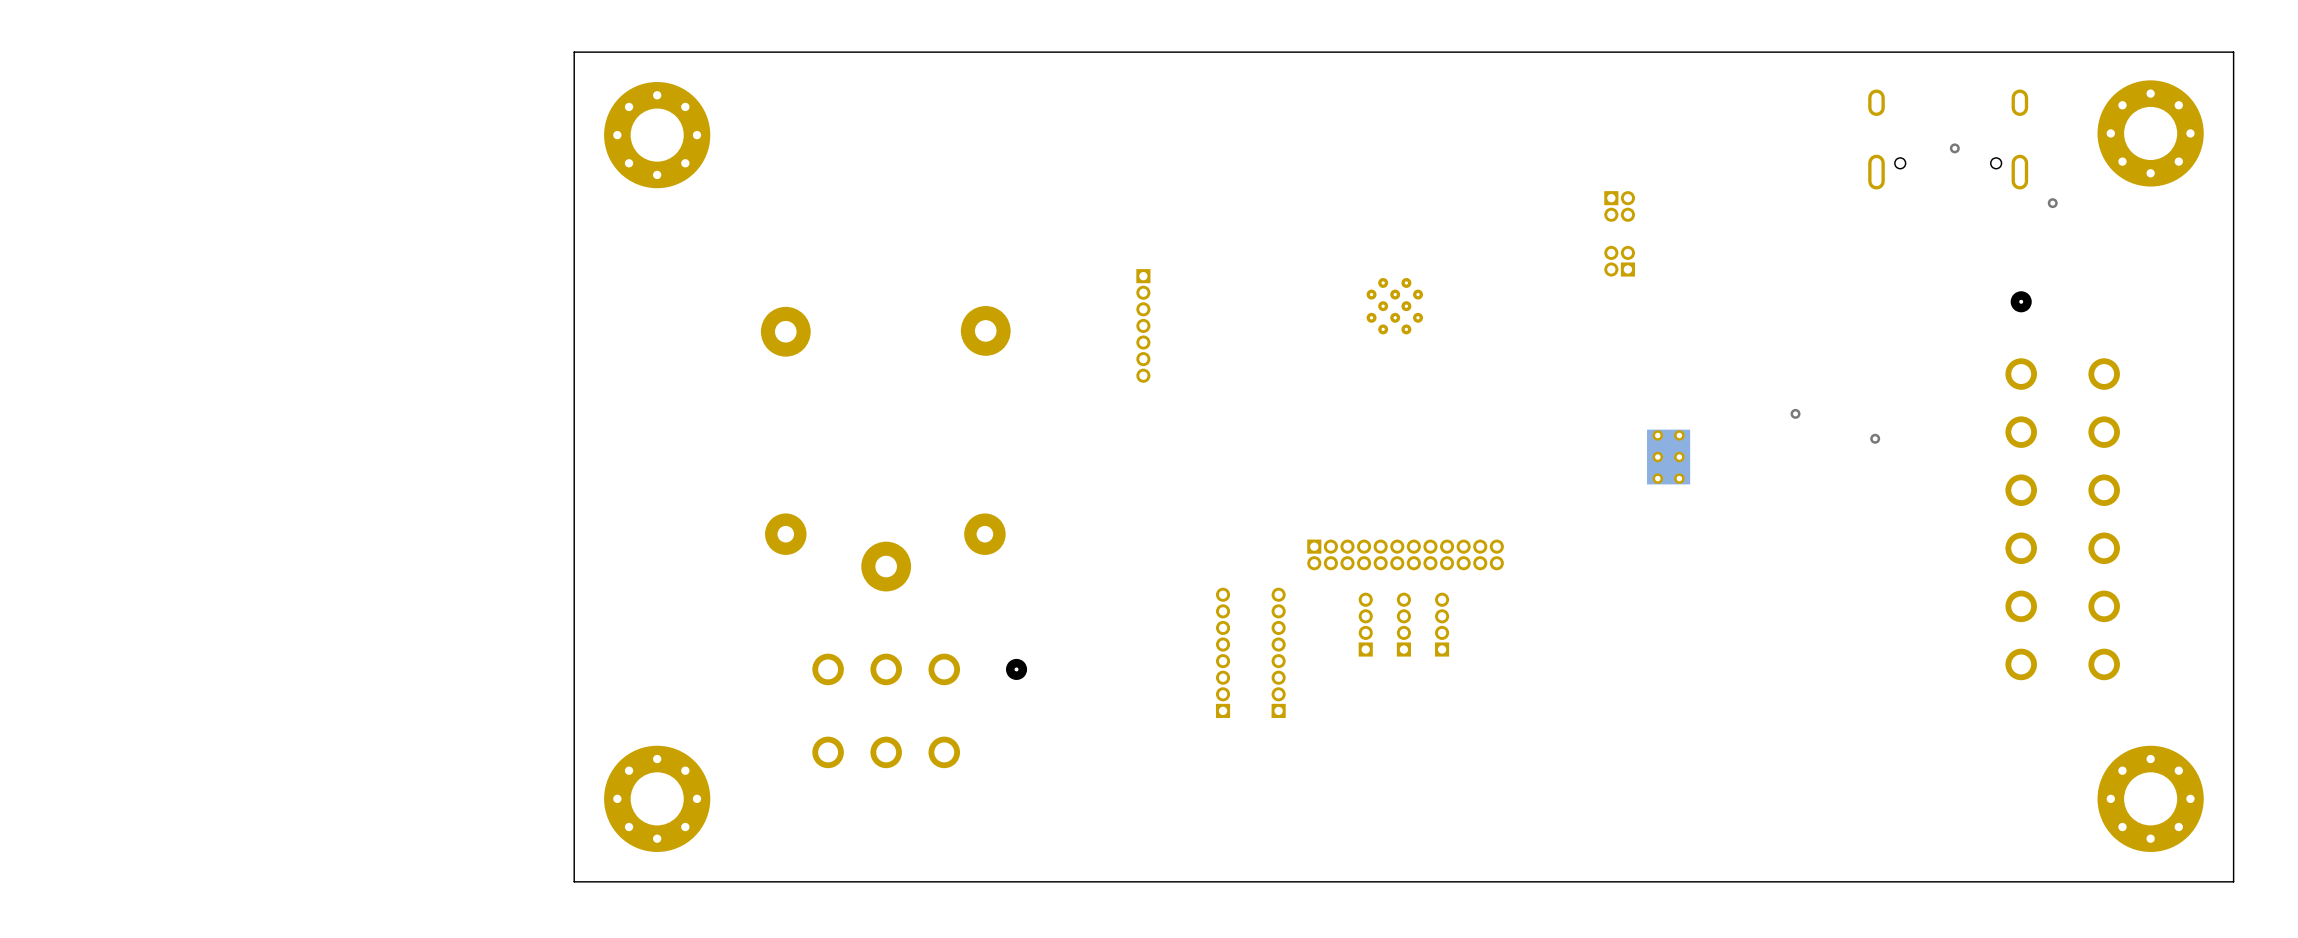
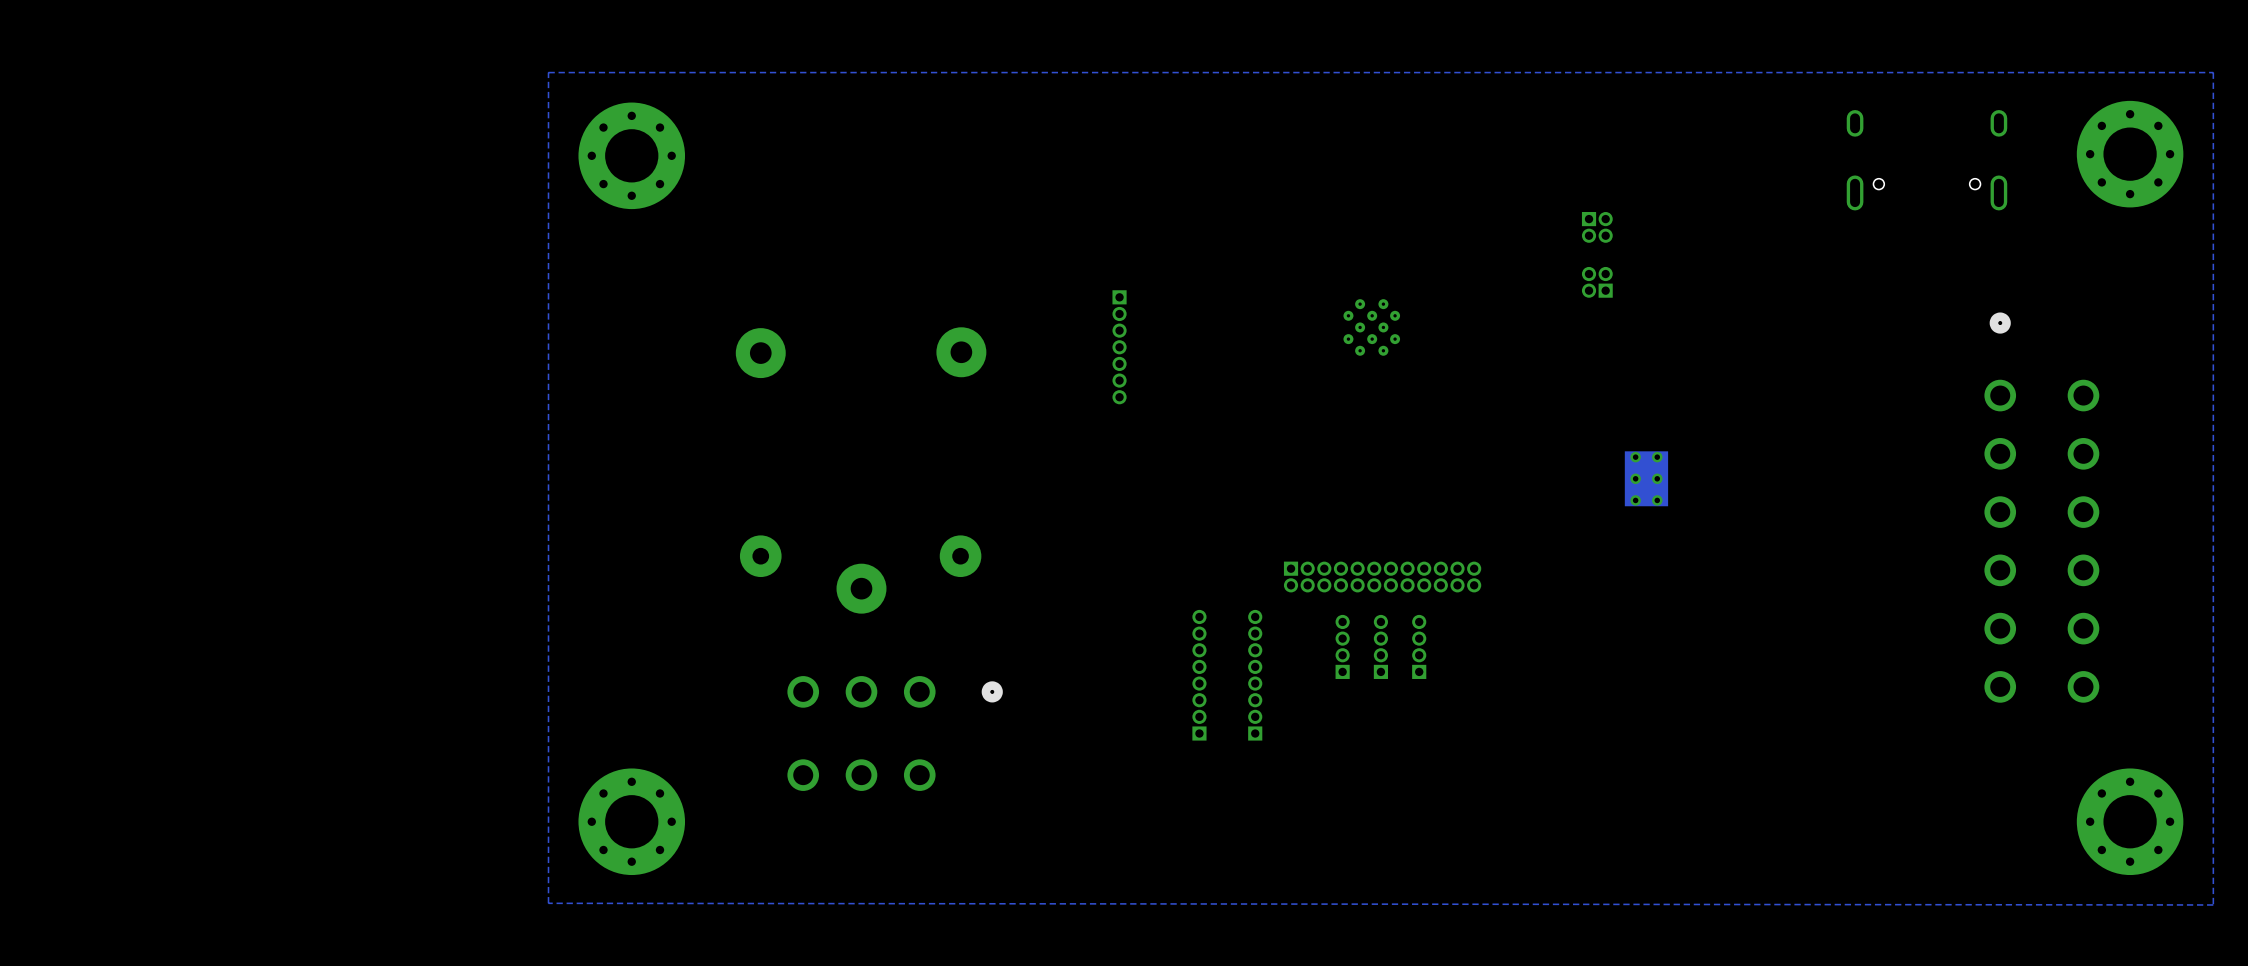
board edge: (2233, 52) (574, 52) (574, 881) (2233, 881) (2233, 52) -> none
zone outline: none -> (2213, 72) (548, 72) (548, 903) (2213, 904) (2213, 72)
via: (1954, 148) -> none
via: (2052, 203) -> none
via: (1795, 413) -> none
via: (1875, 438) -> none

